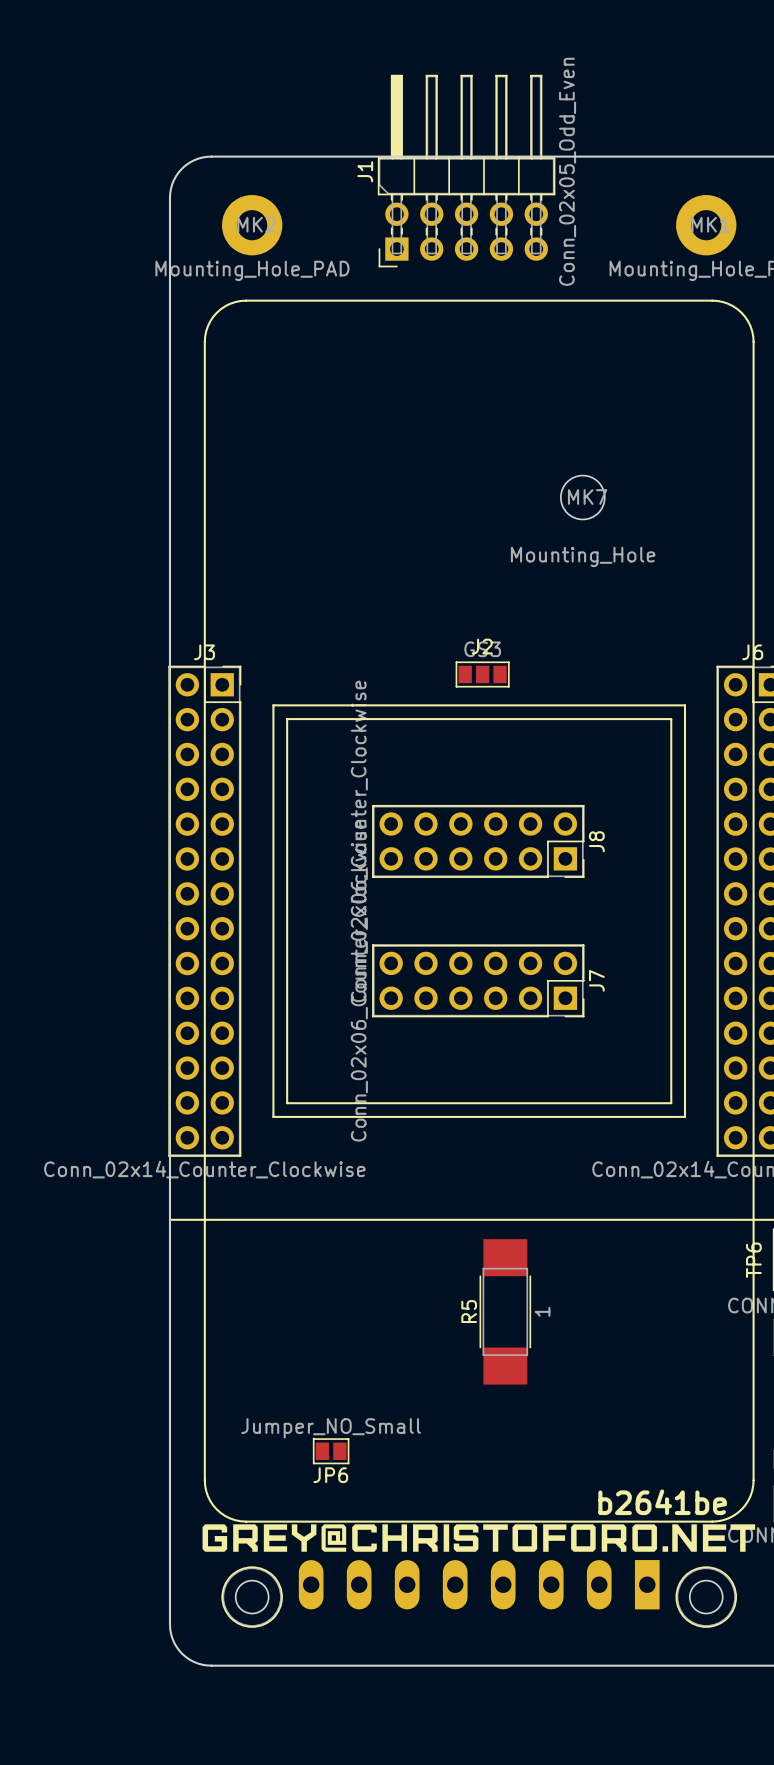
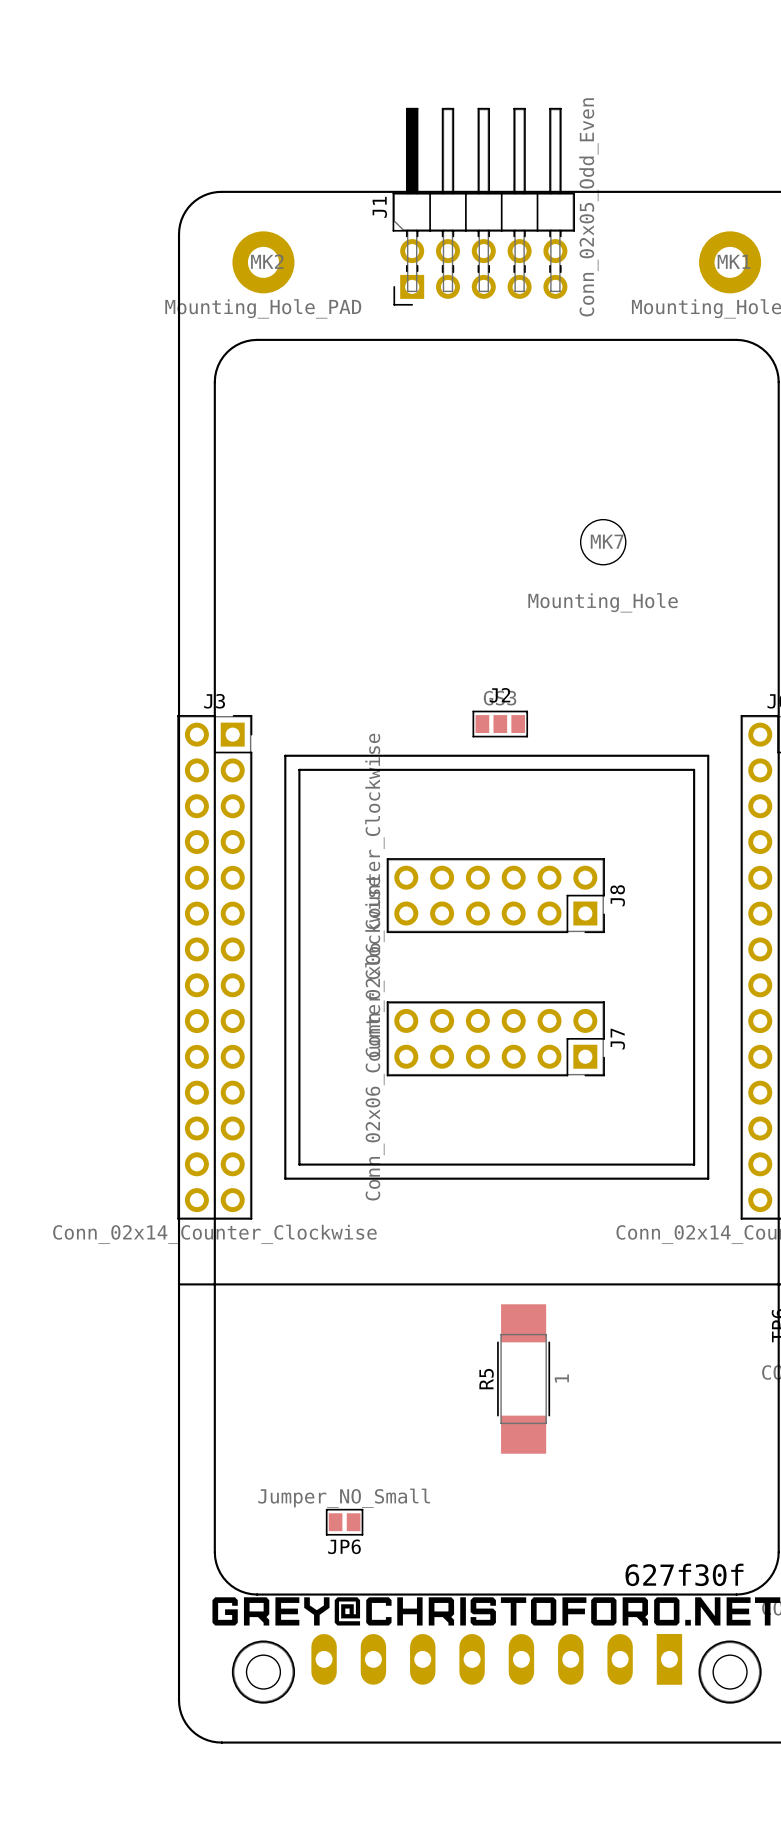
text: b2641be (662, 1502) -> 627f30f (684, 1574)

